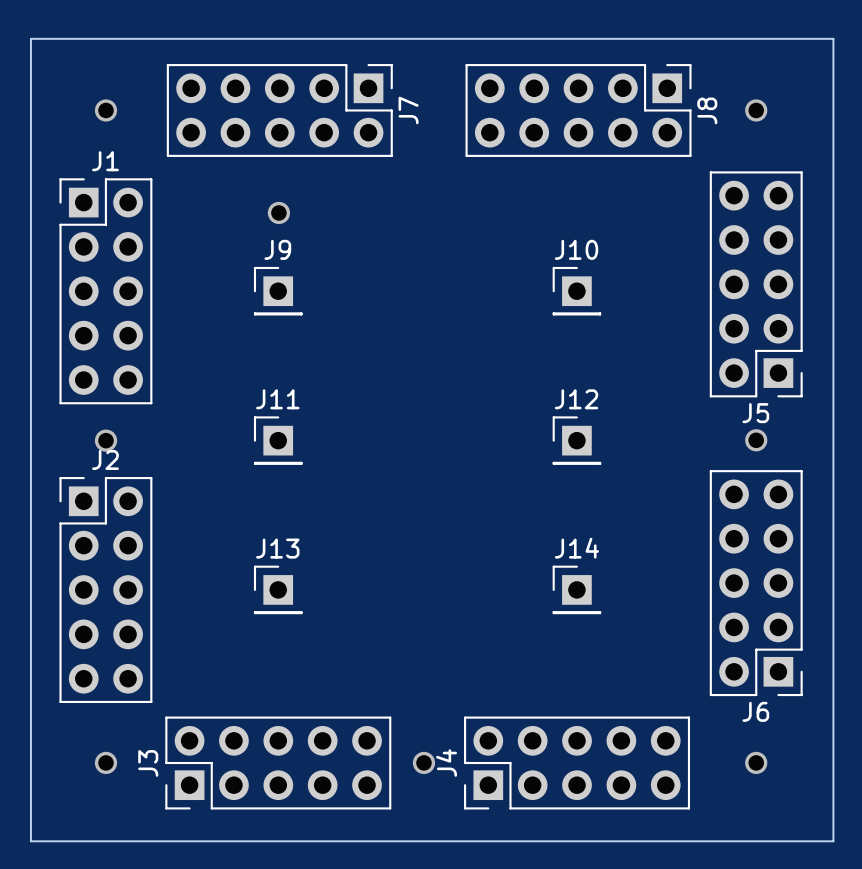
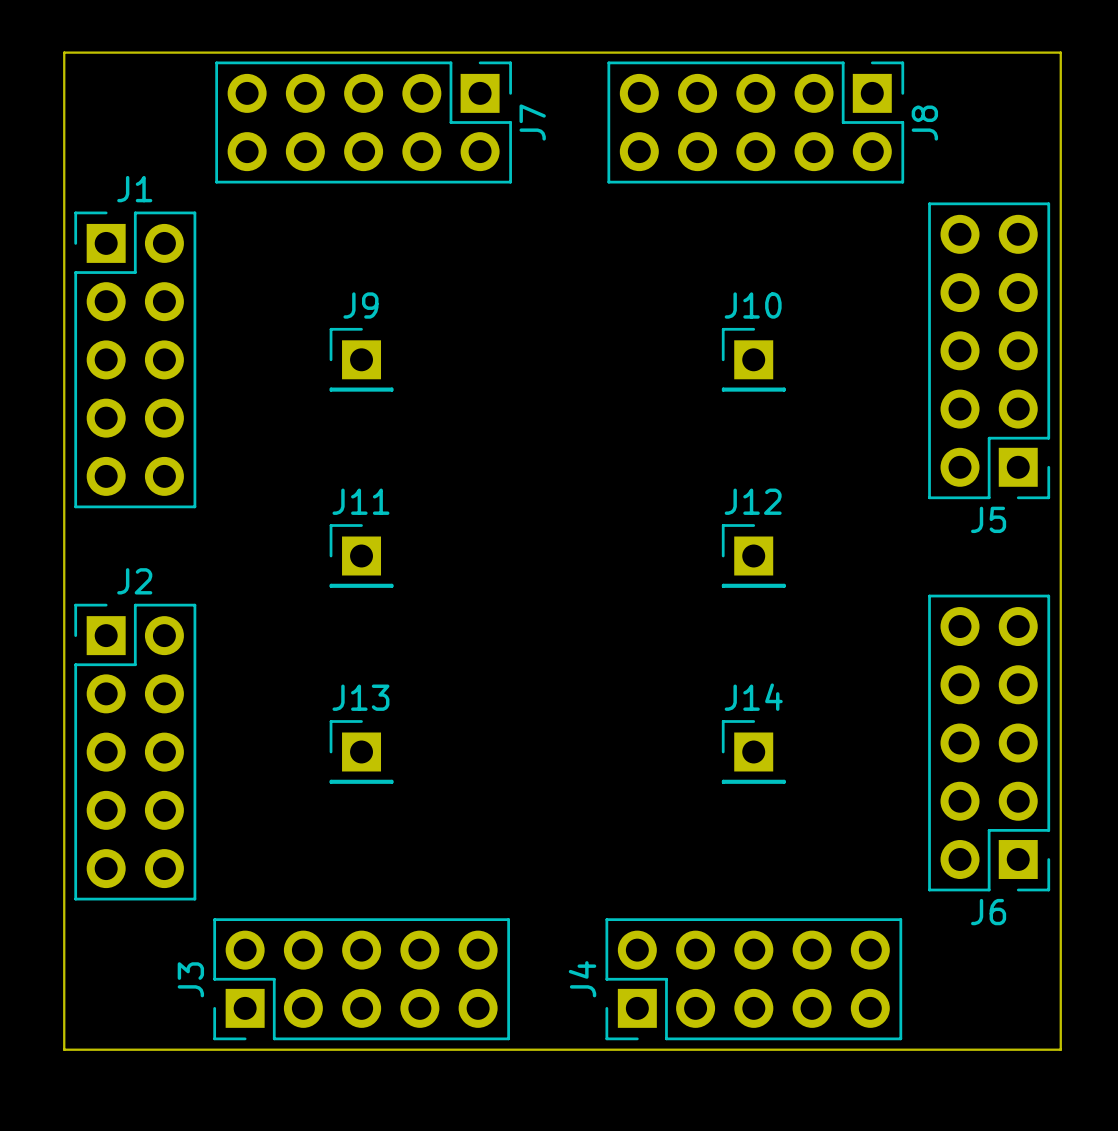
board edge: (30, 38) (833, 38) (833, 841) (30, 841) (30, 38) -> (64, 52) (64, 1049) (1060, 1049) (1060, 52) (64, 52)
via: (106, 110) -> none
via: (756, 110) -> none
via: (278, 212) -> none
via: (106, 440) -> none
via: (756, 440) -> none
via: (106, 762) -> none
via: (423, 762) -> none
via: (756, 762) -> none

